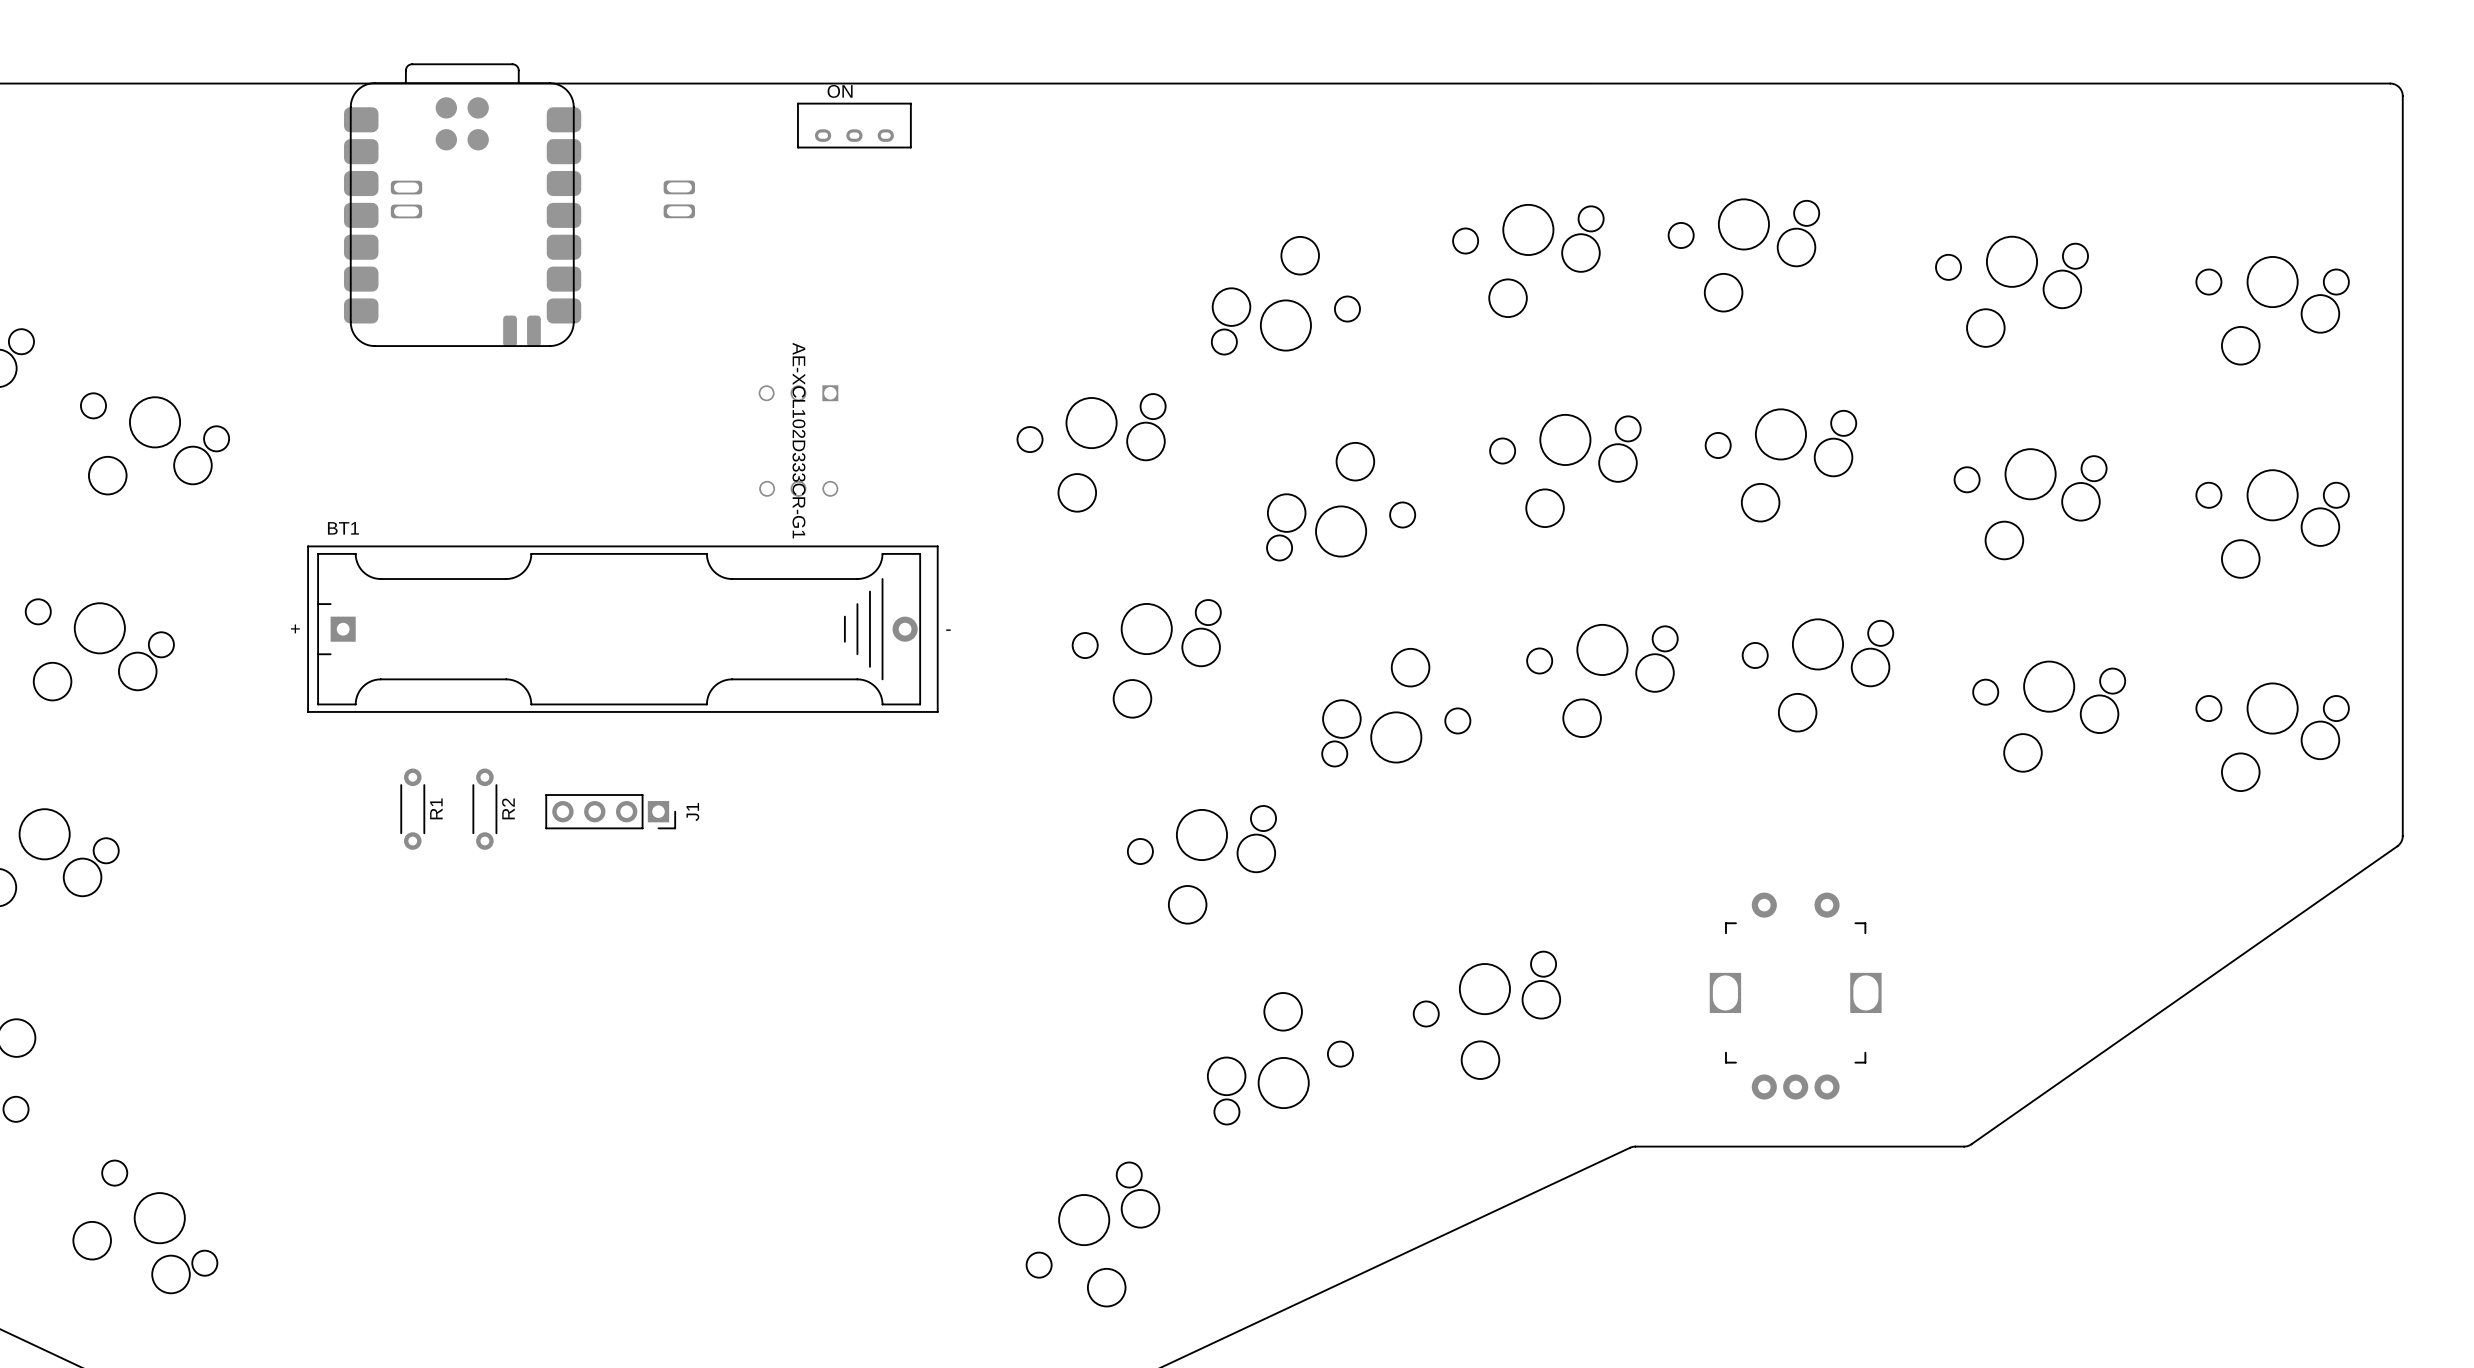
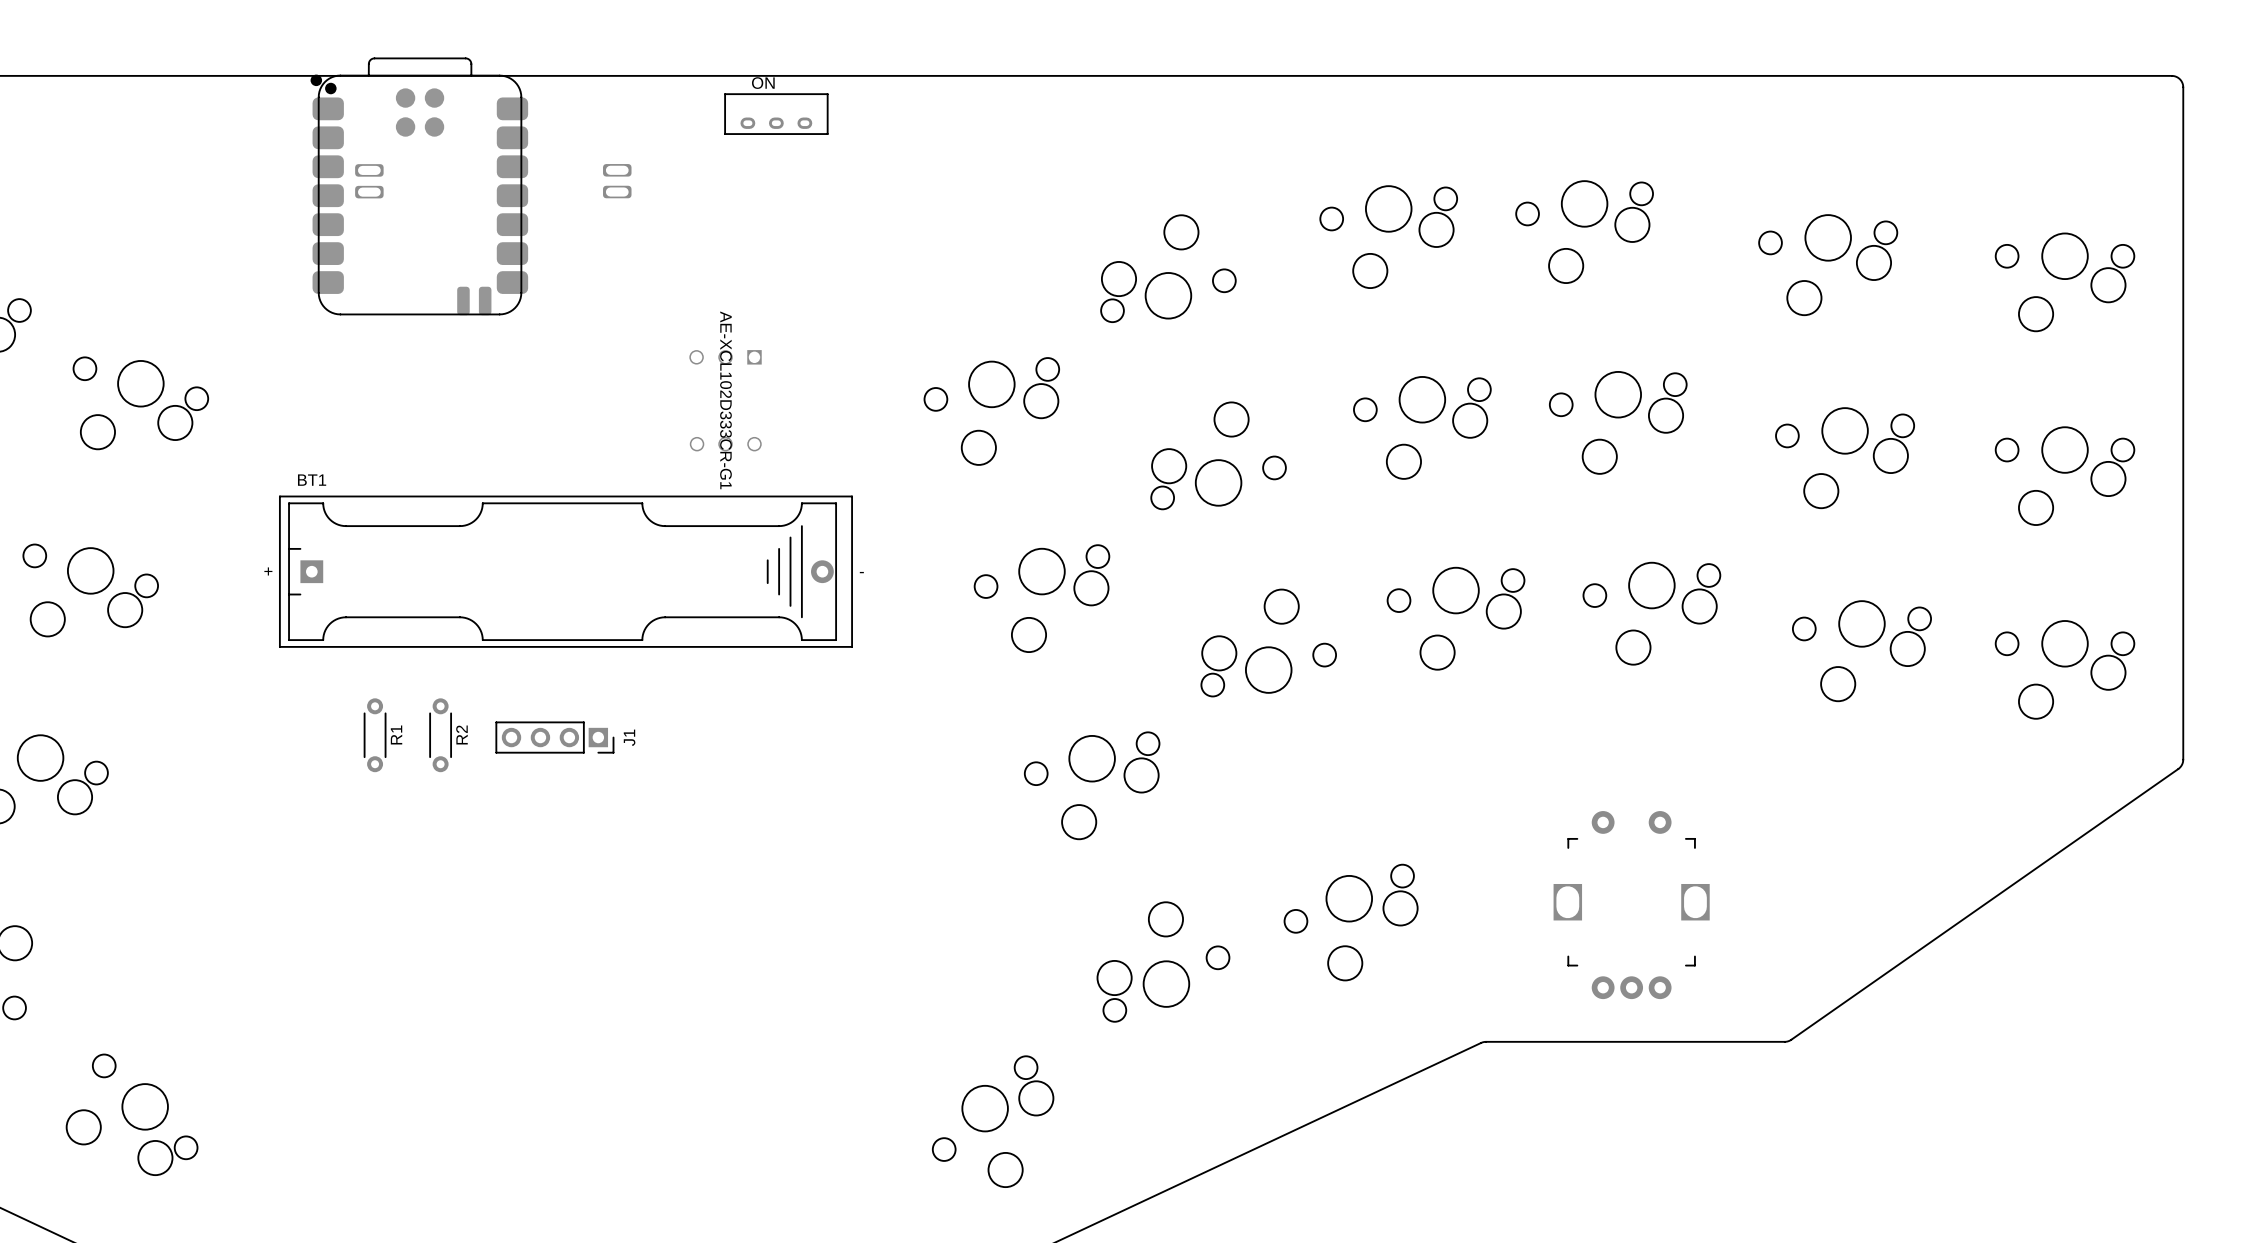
part footprint: [343, 63, 582, 347] -> [310, 57, 529, 316]

